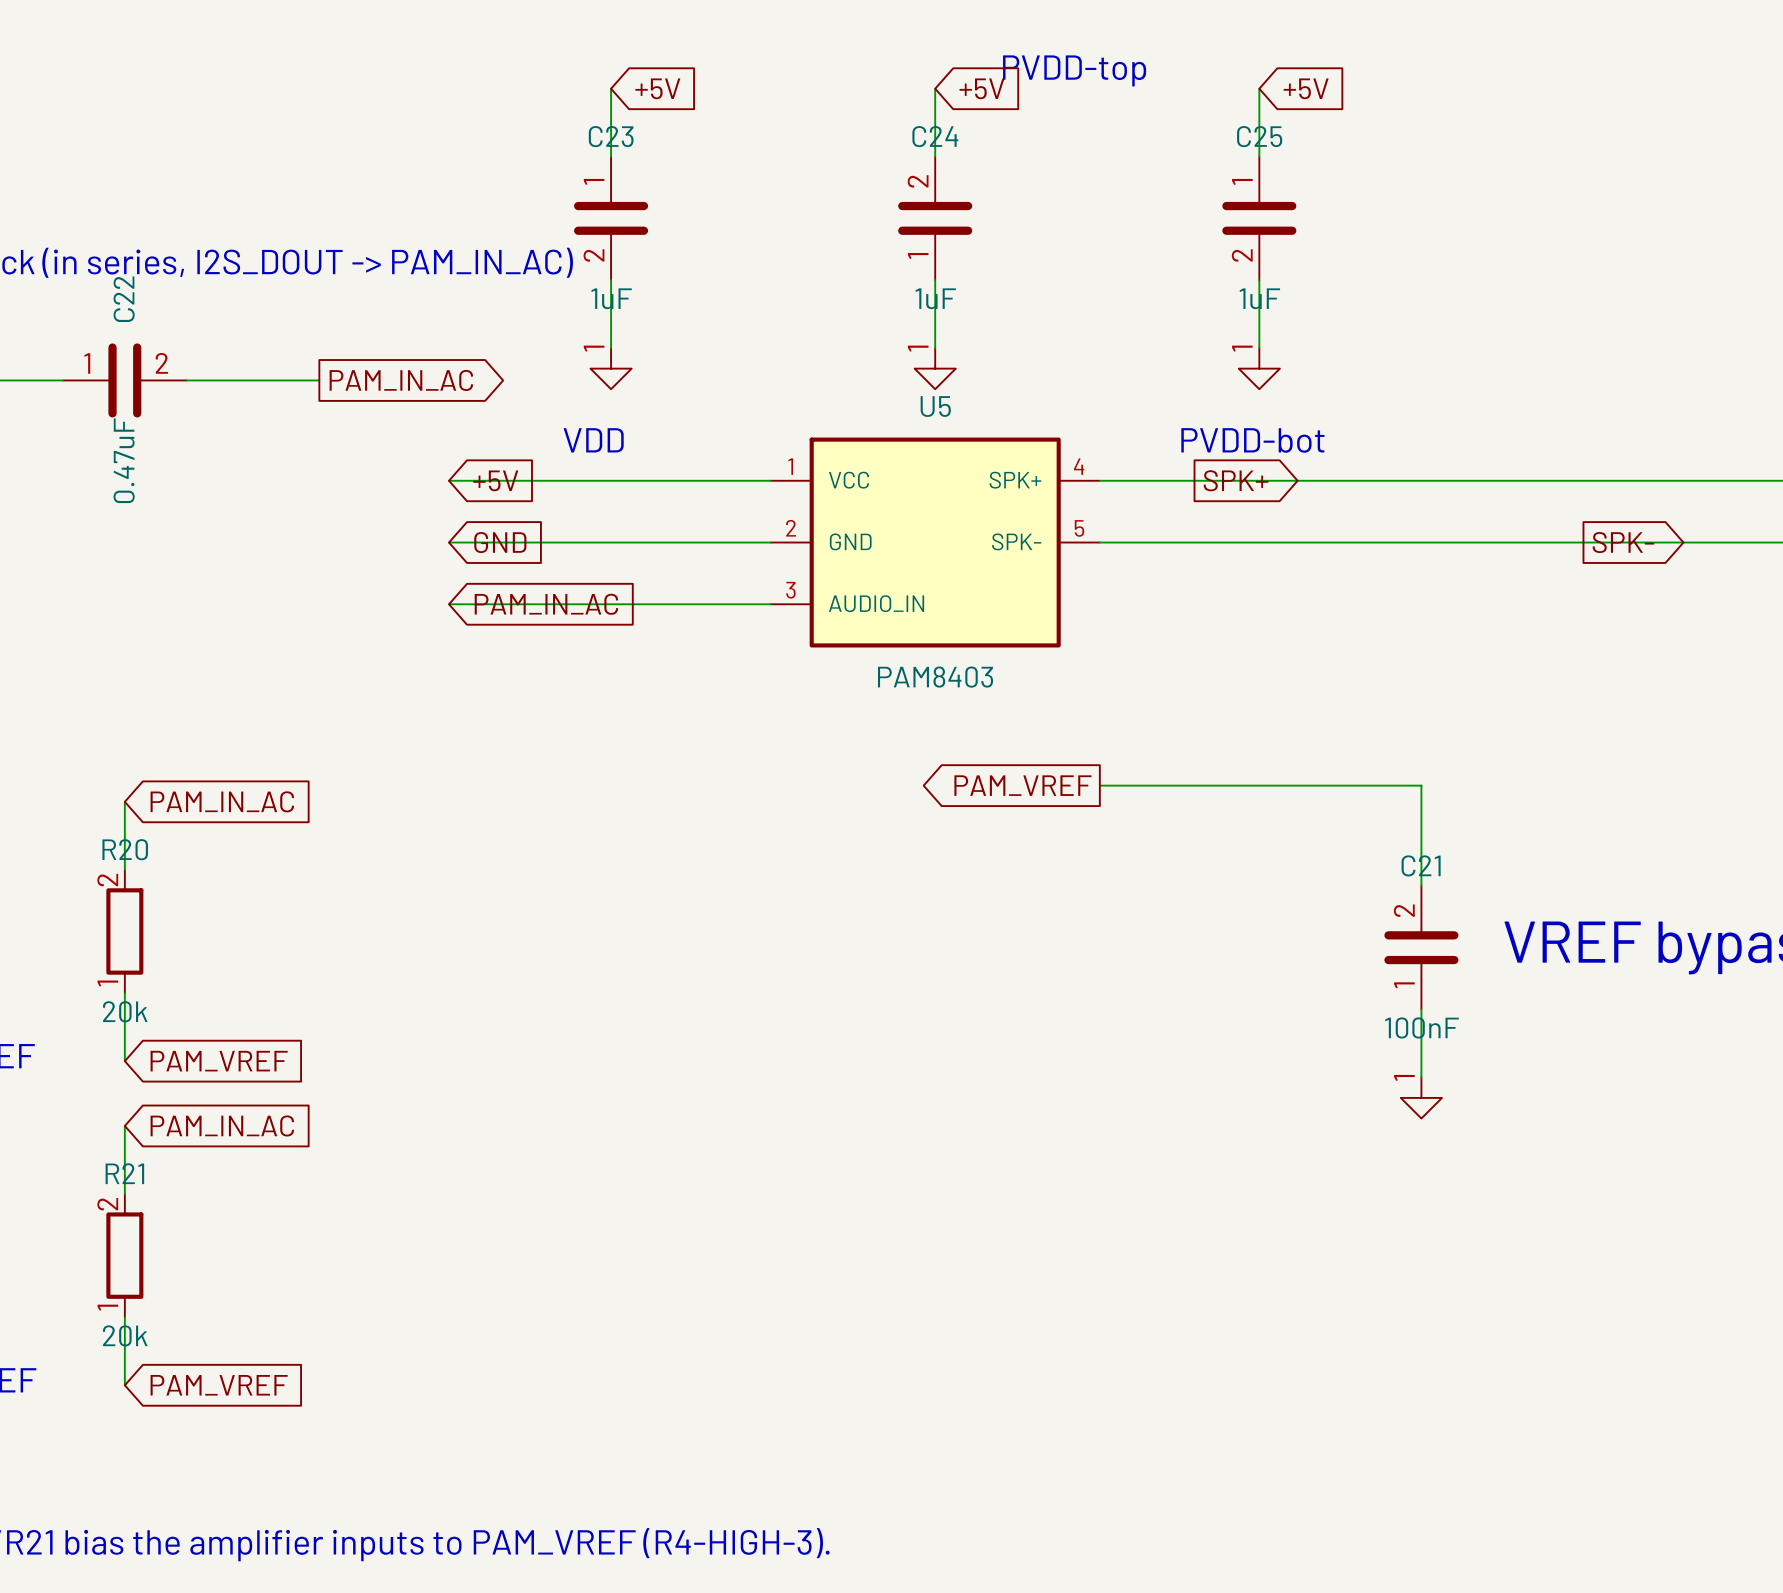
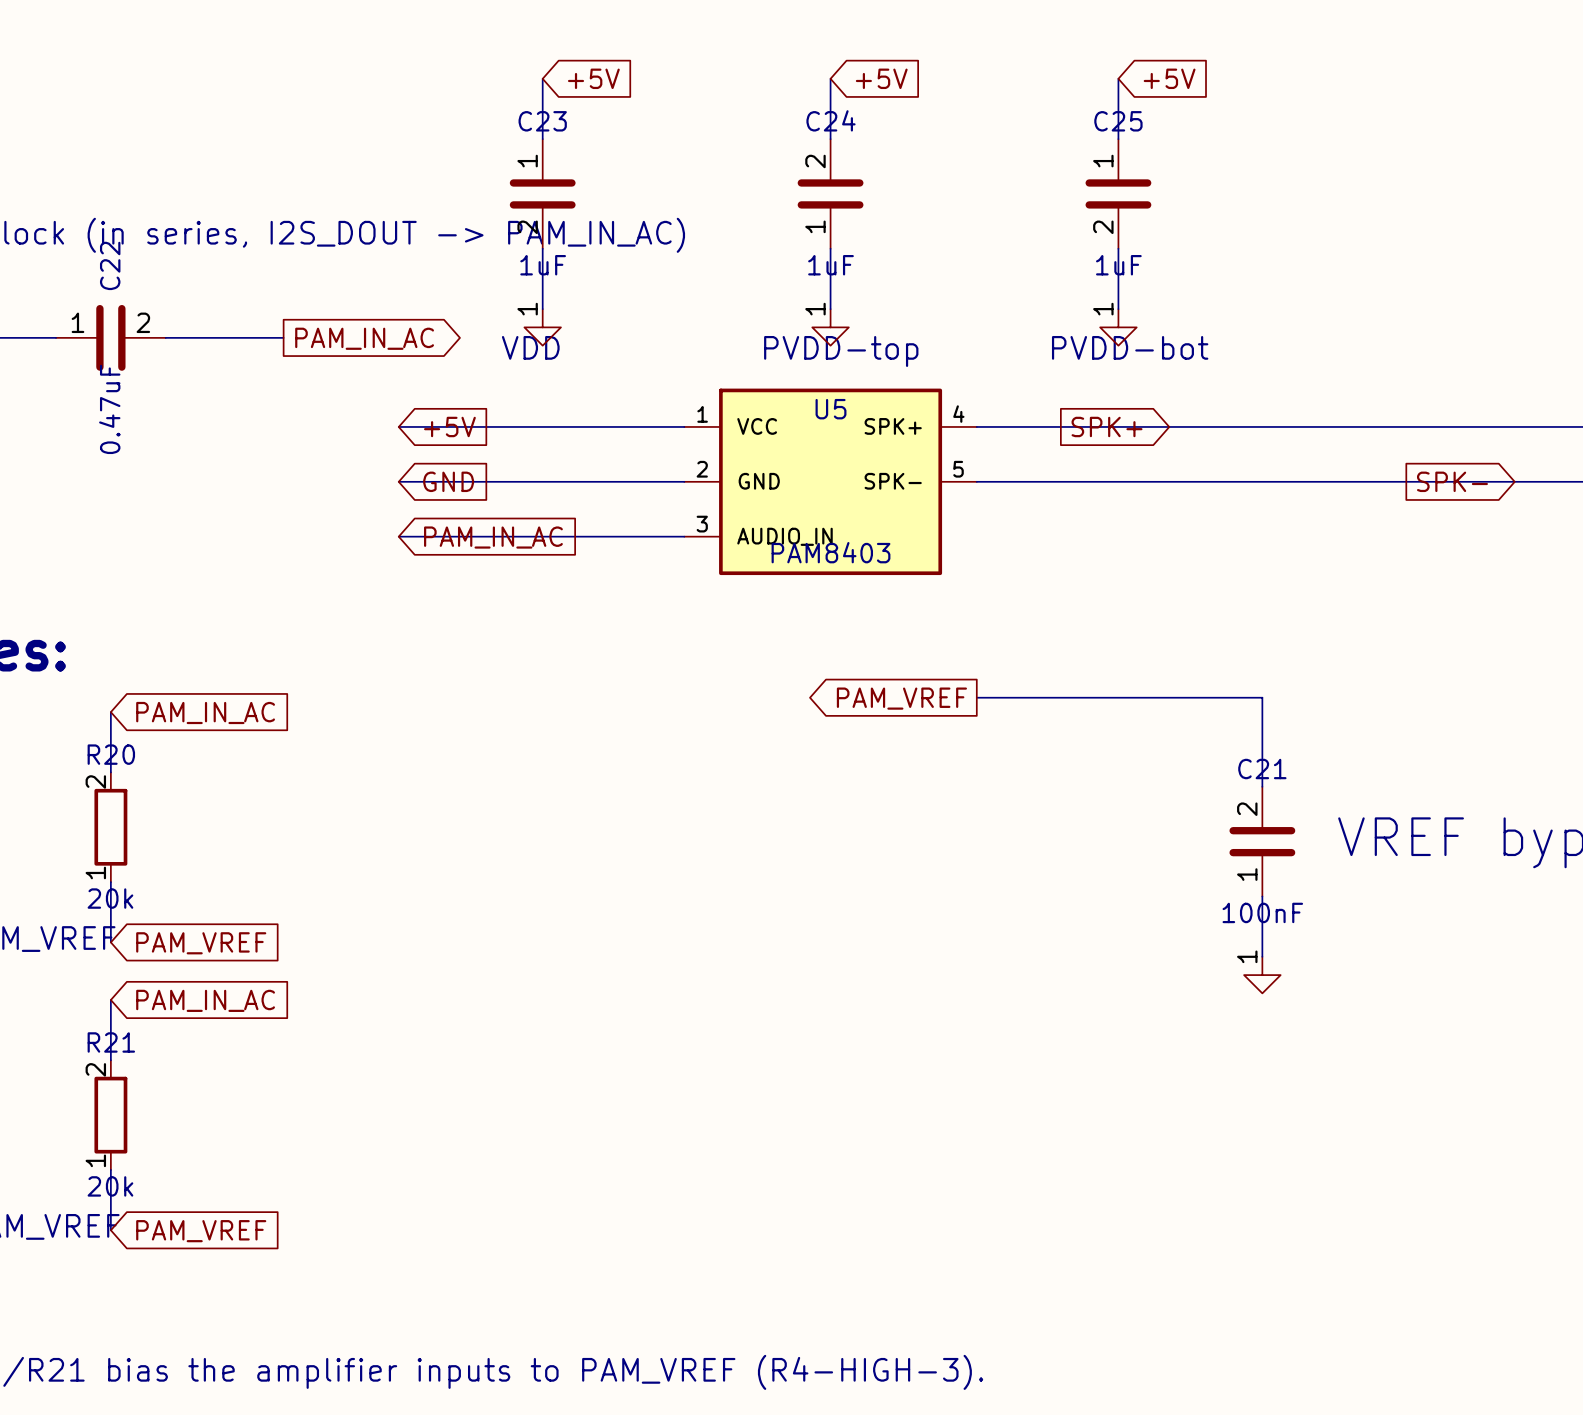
text position: PVDD-top (1074, 70) -> PVDD-top (841, 351)
U5 name position: U5 (935, 406) -> U5 (831, 409)
text position: VDD (593, 440) -> VDD (530, 347)
text position: PVDD-bot (1252, 440) -> PVDD-bot (1130, 347)
U5 value position: PAM8403 (935, 677) -> PAM8403 (831, 552)

